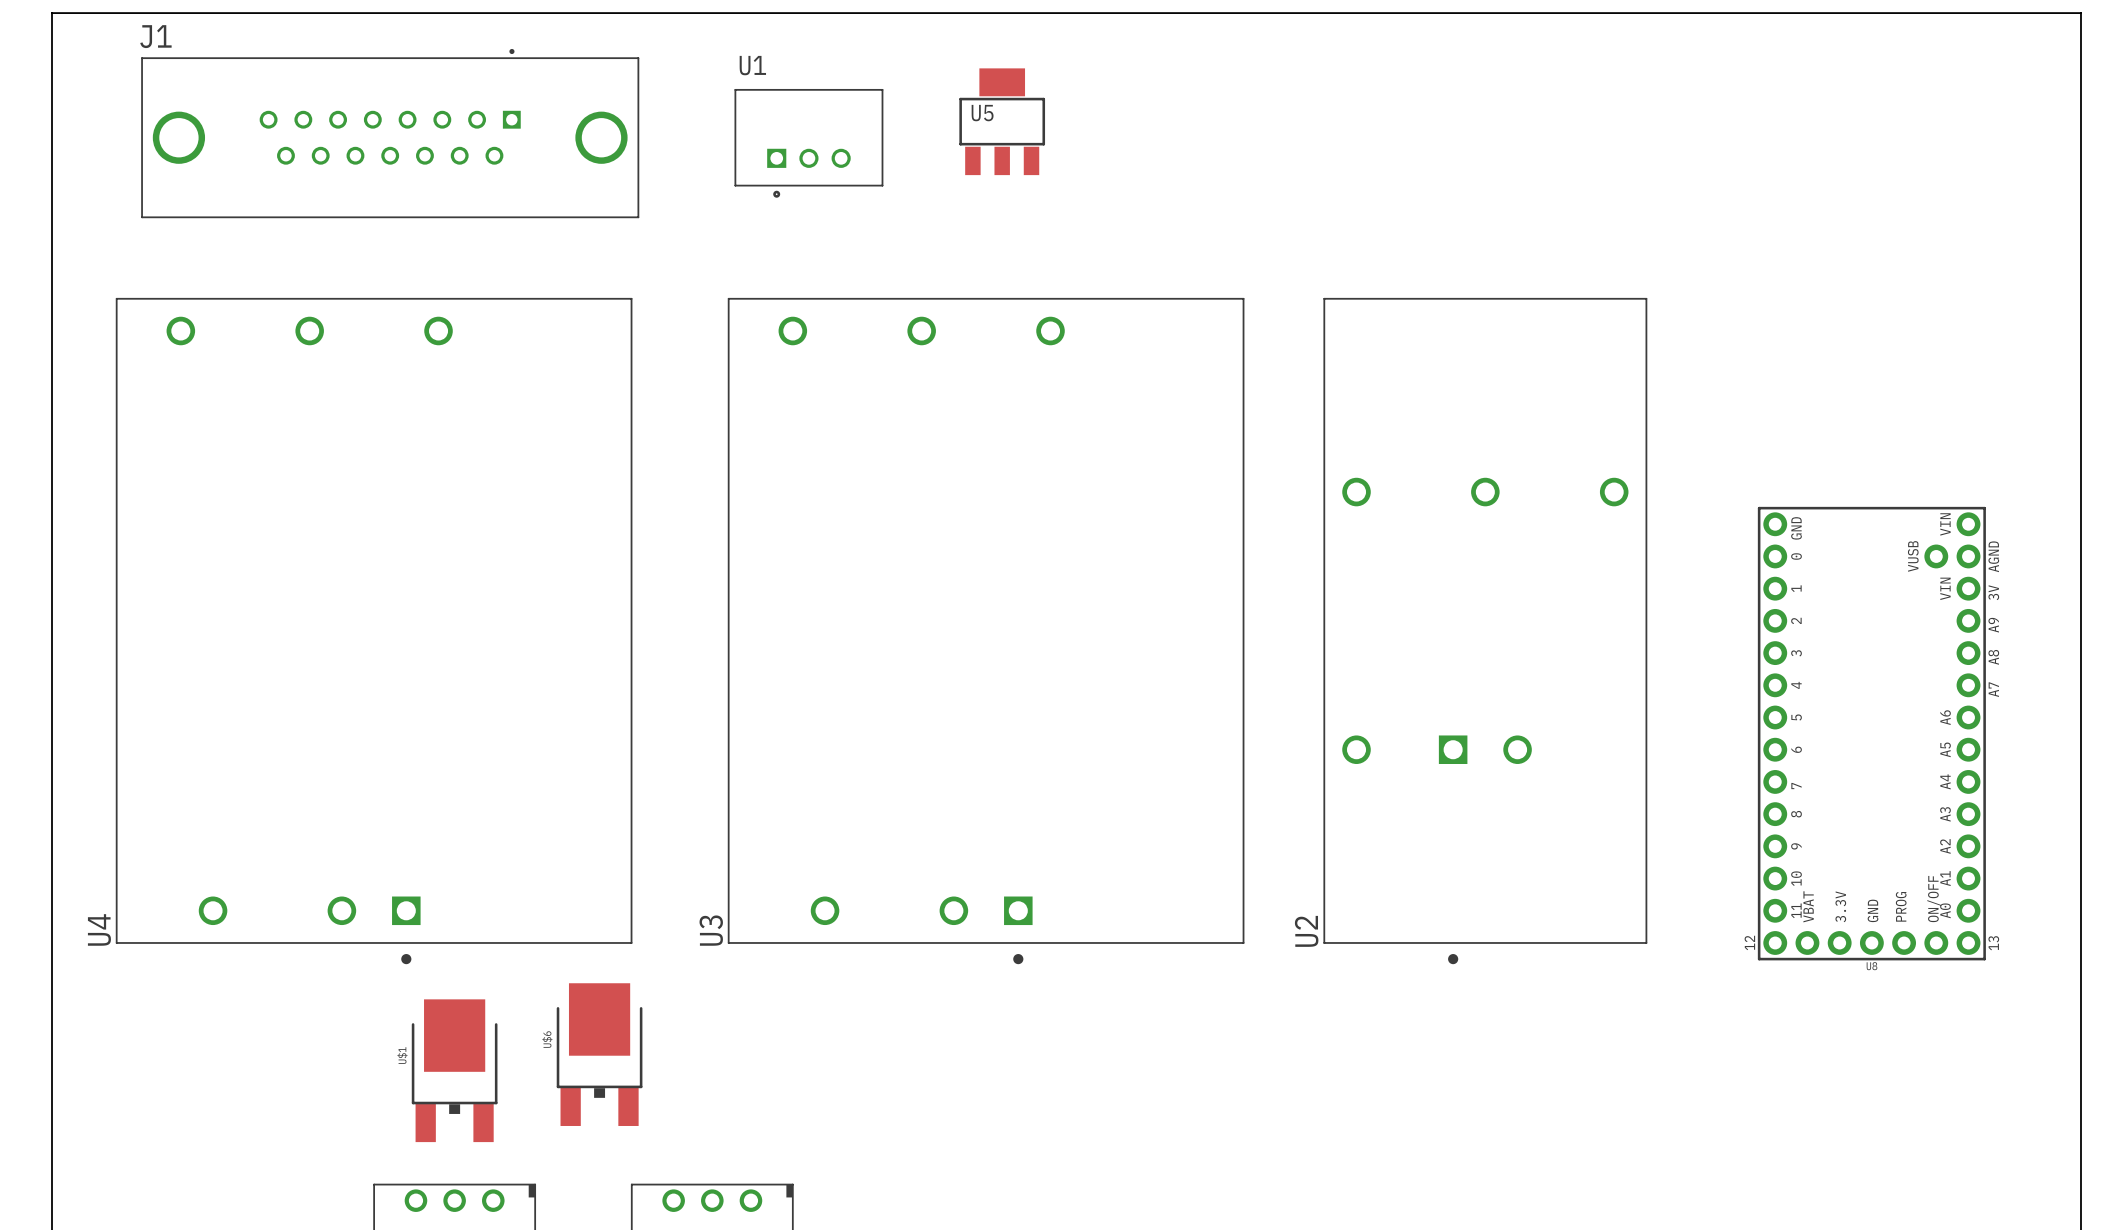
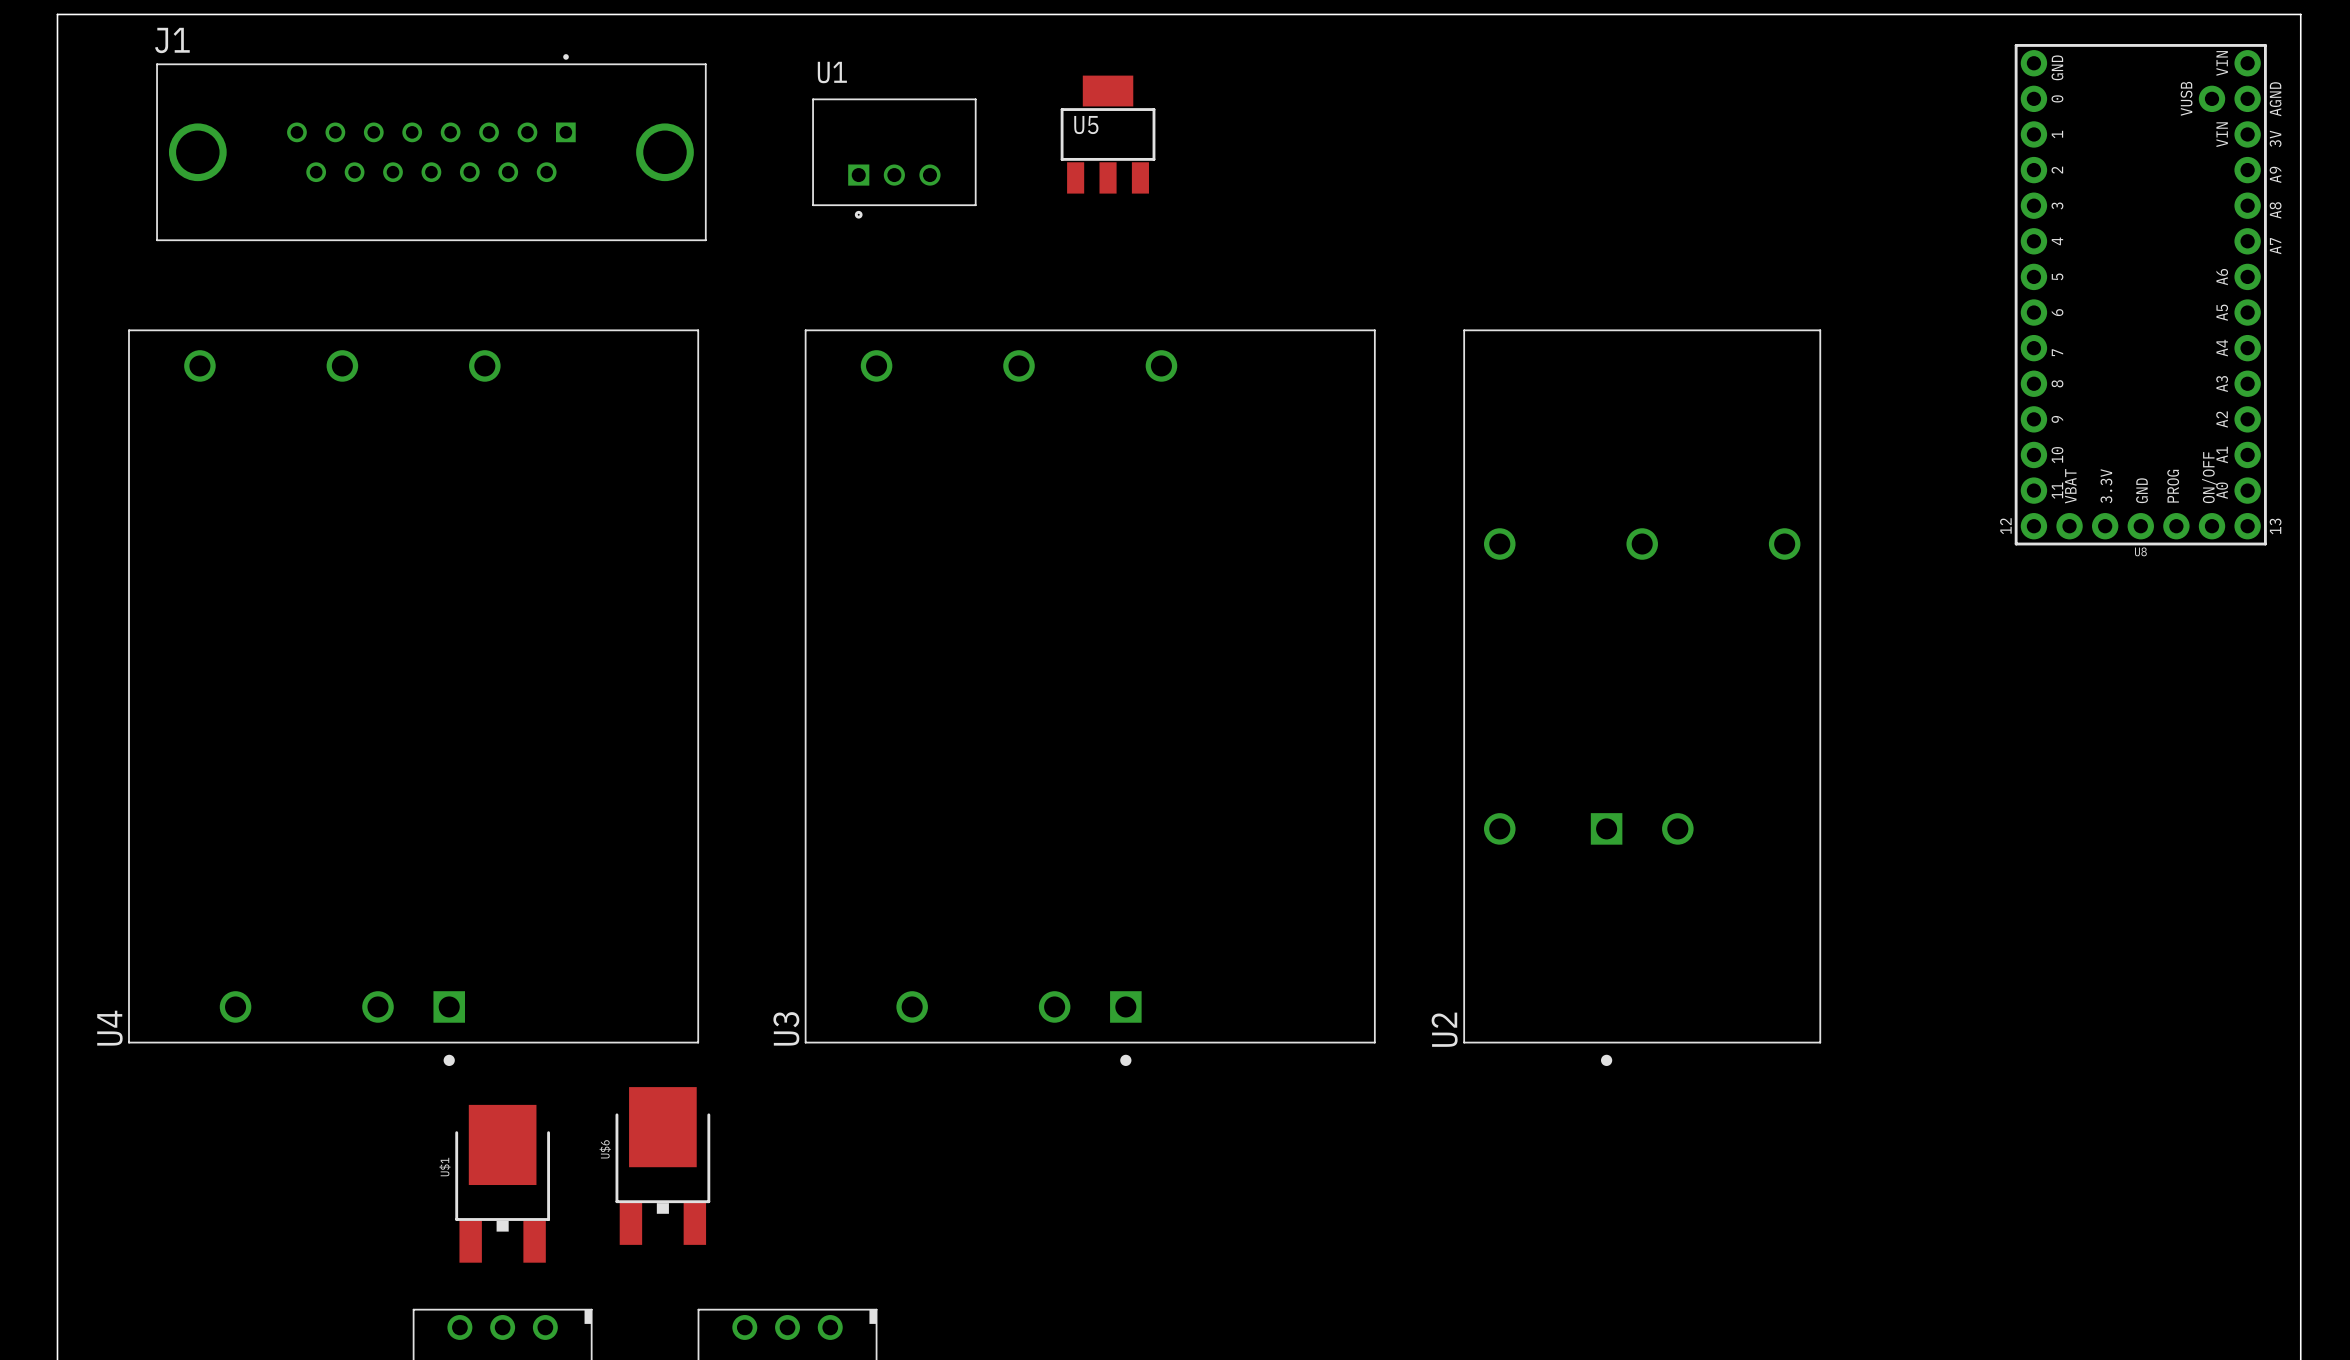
U8 position: (1871, 733) -> (2140, 294)

